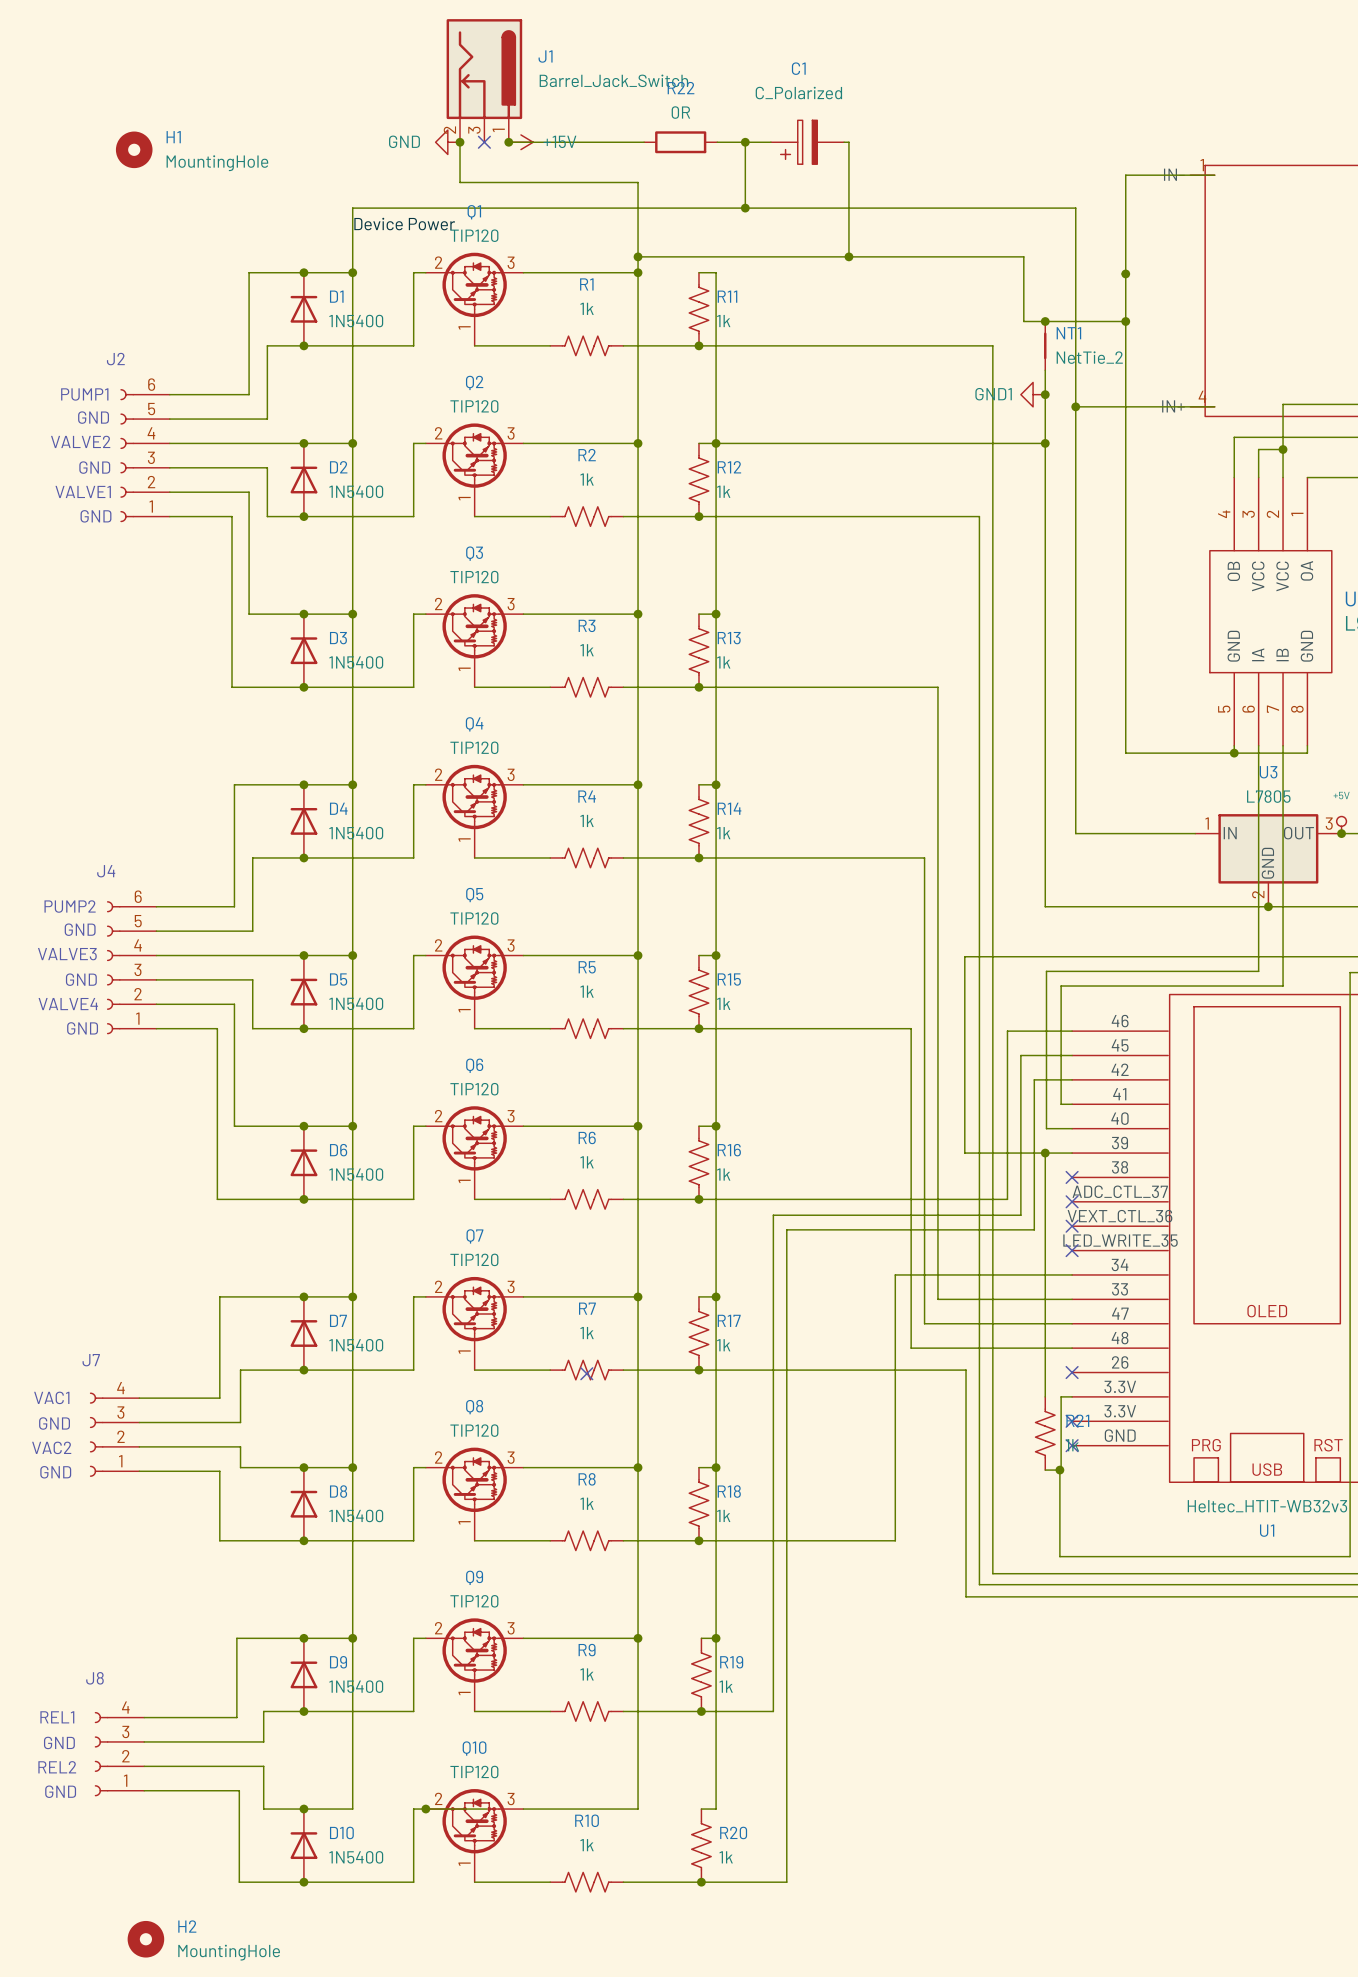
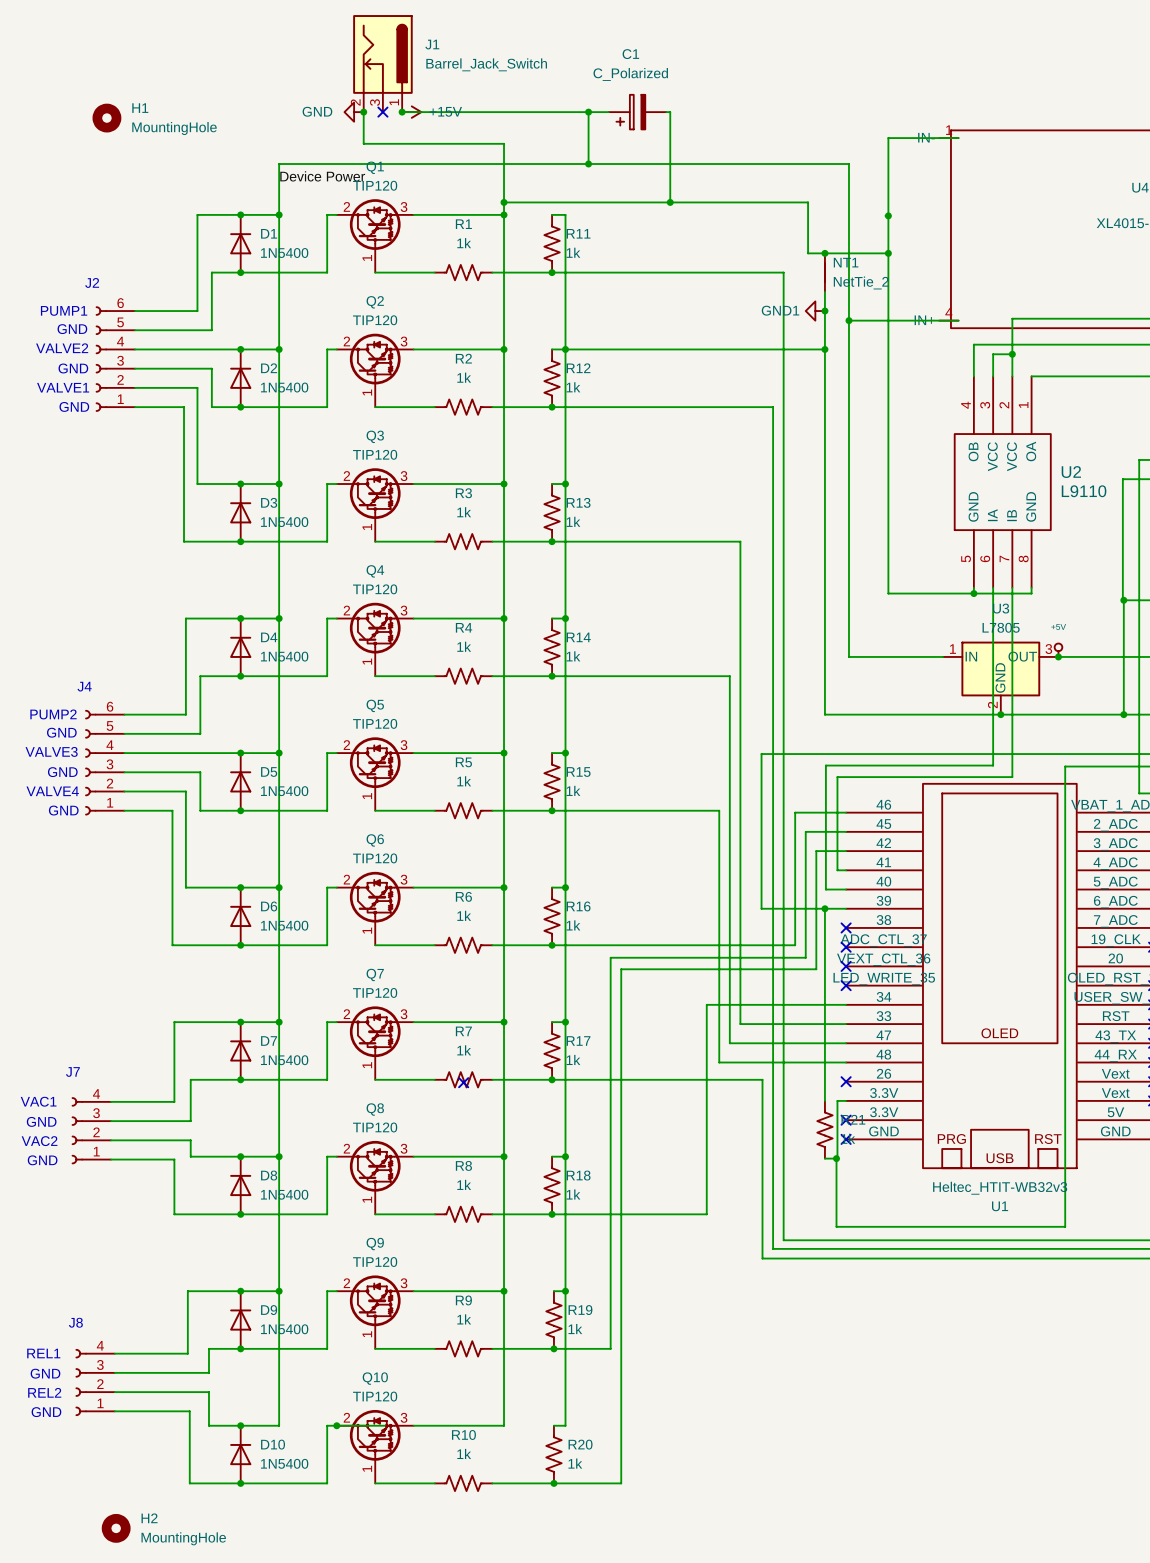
wire: none -> (508, 112) (566, 112)
R22: 0R (680, 142) -> none

